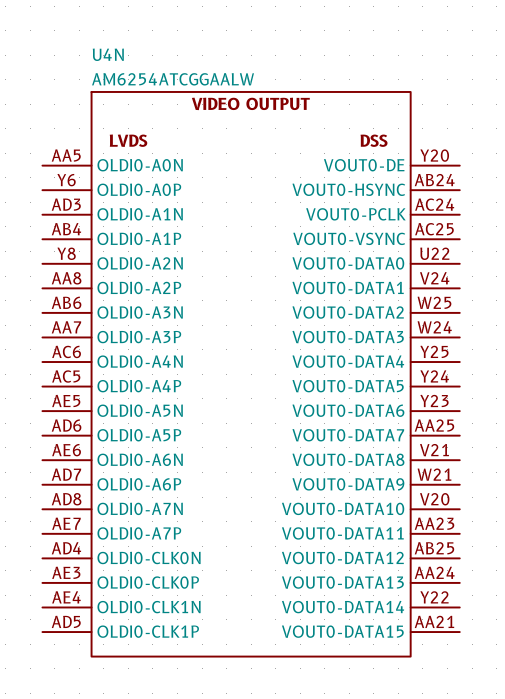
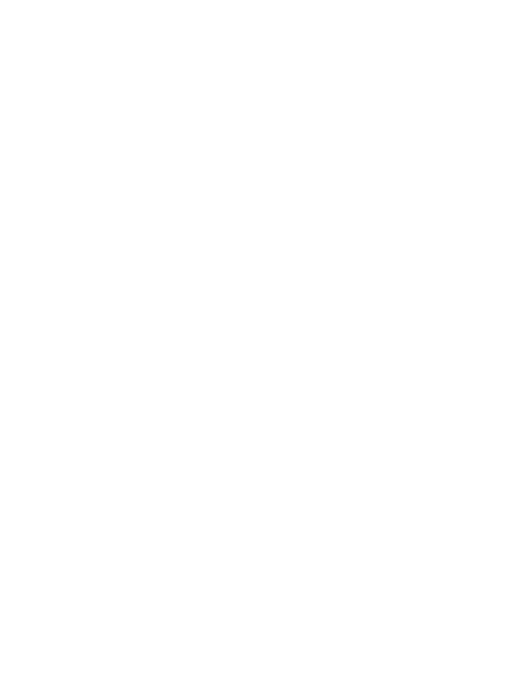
U4N: AM6254ATCGGAALW (251, 374) -> none

